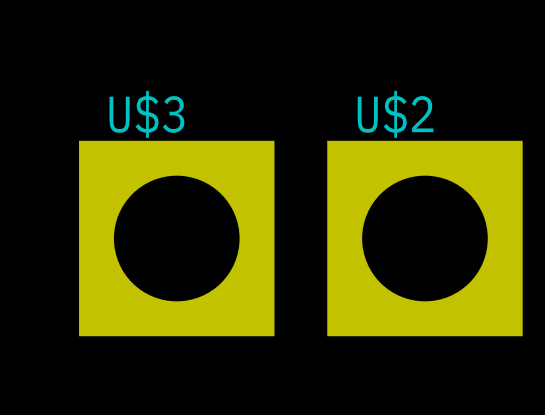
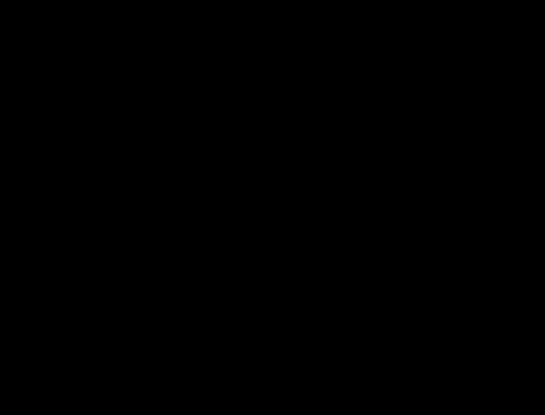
U$3: (176, 238) -> none
U$2: (424, 238) -> none

